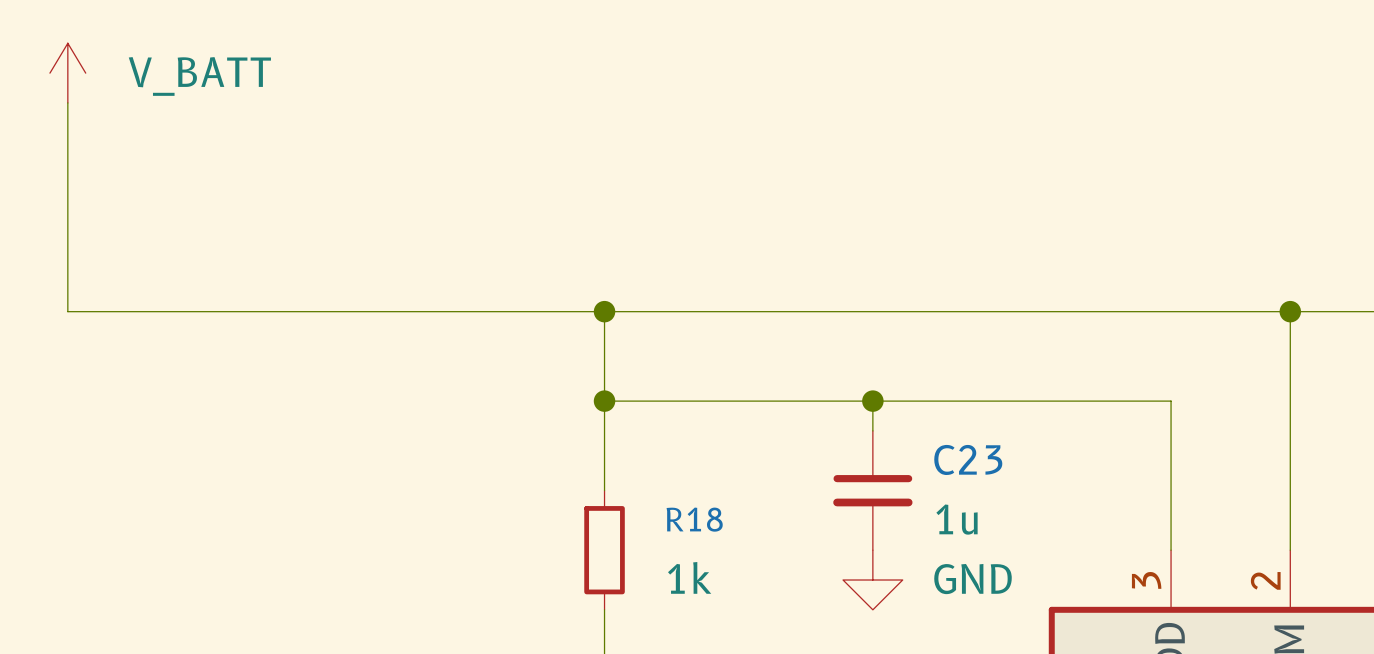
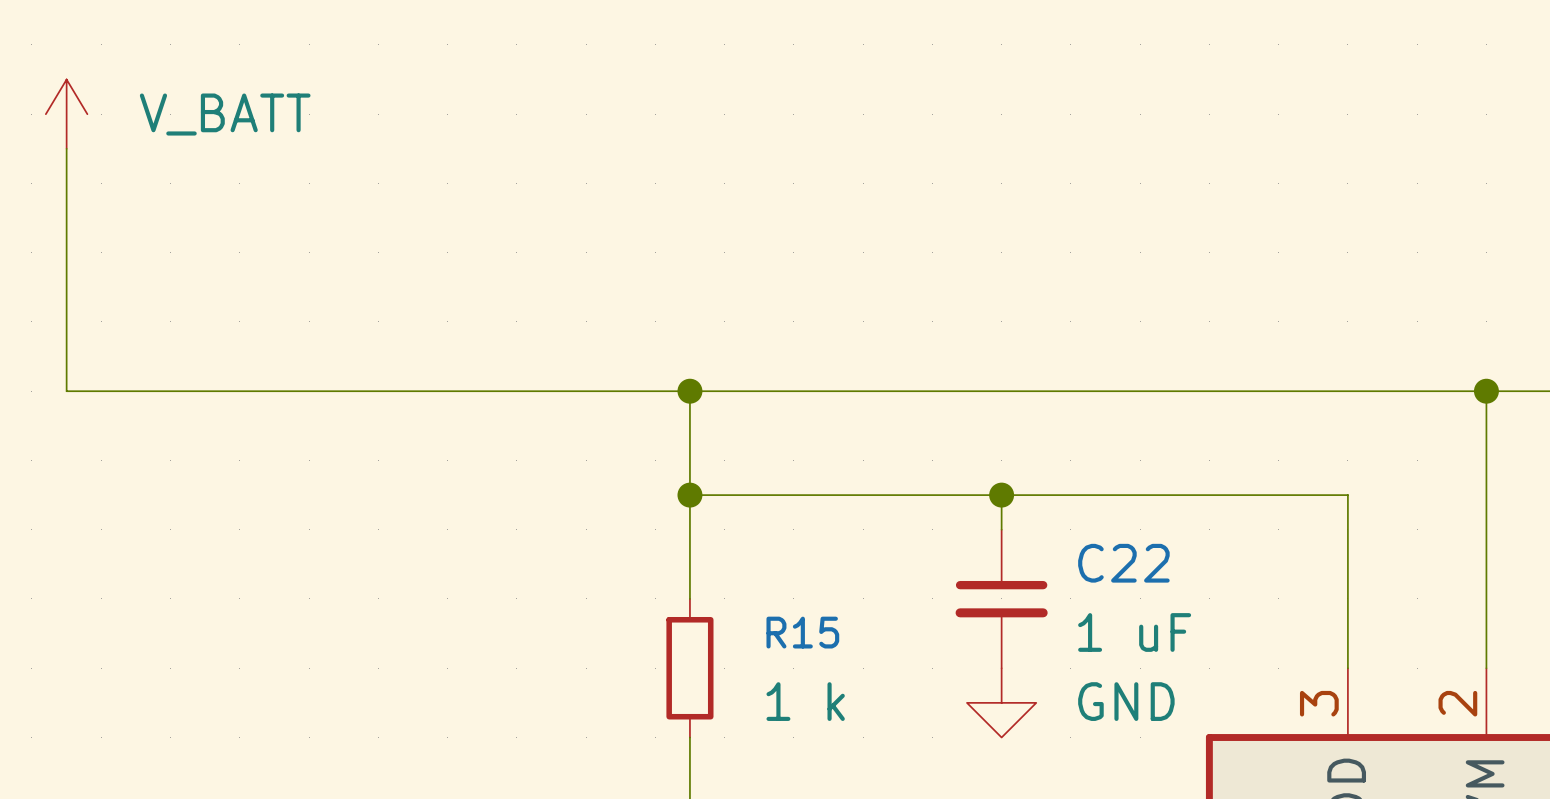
C23 name: C23 (968, 459) -> C22 (1123, 563)
R18 name: R18 (694, 519) -> R15 (802, 632)
C23 value: 1u (956, 519) -> 1 uF (1134, 632)
R18 value: 1k (689, 577) -> 1 k (805, 701)

